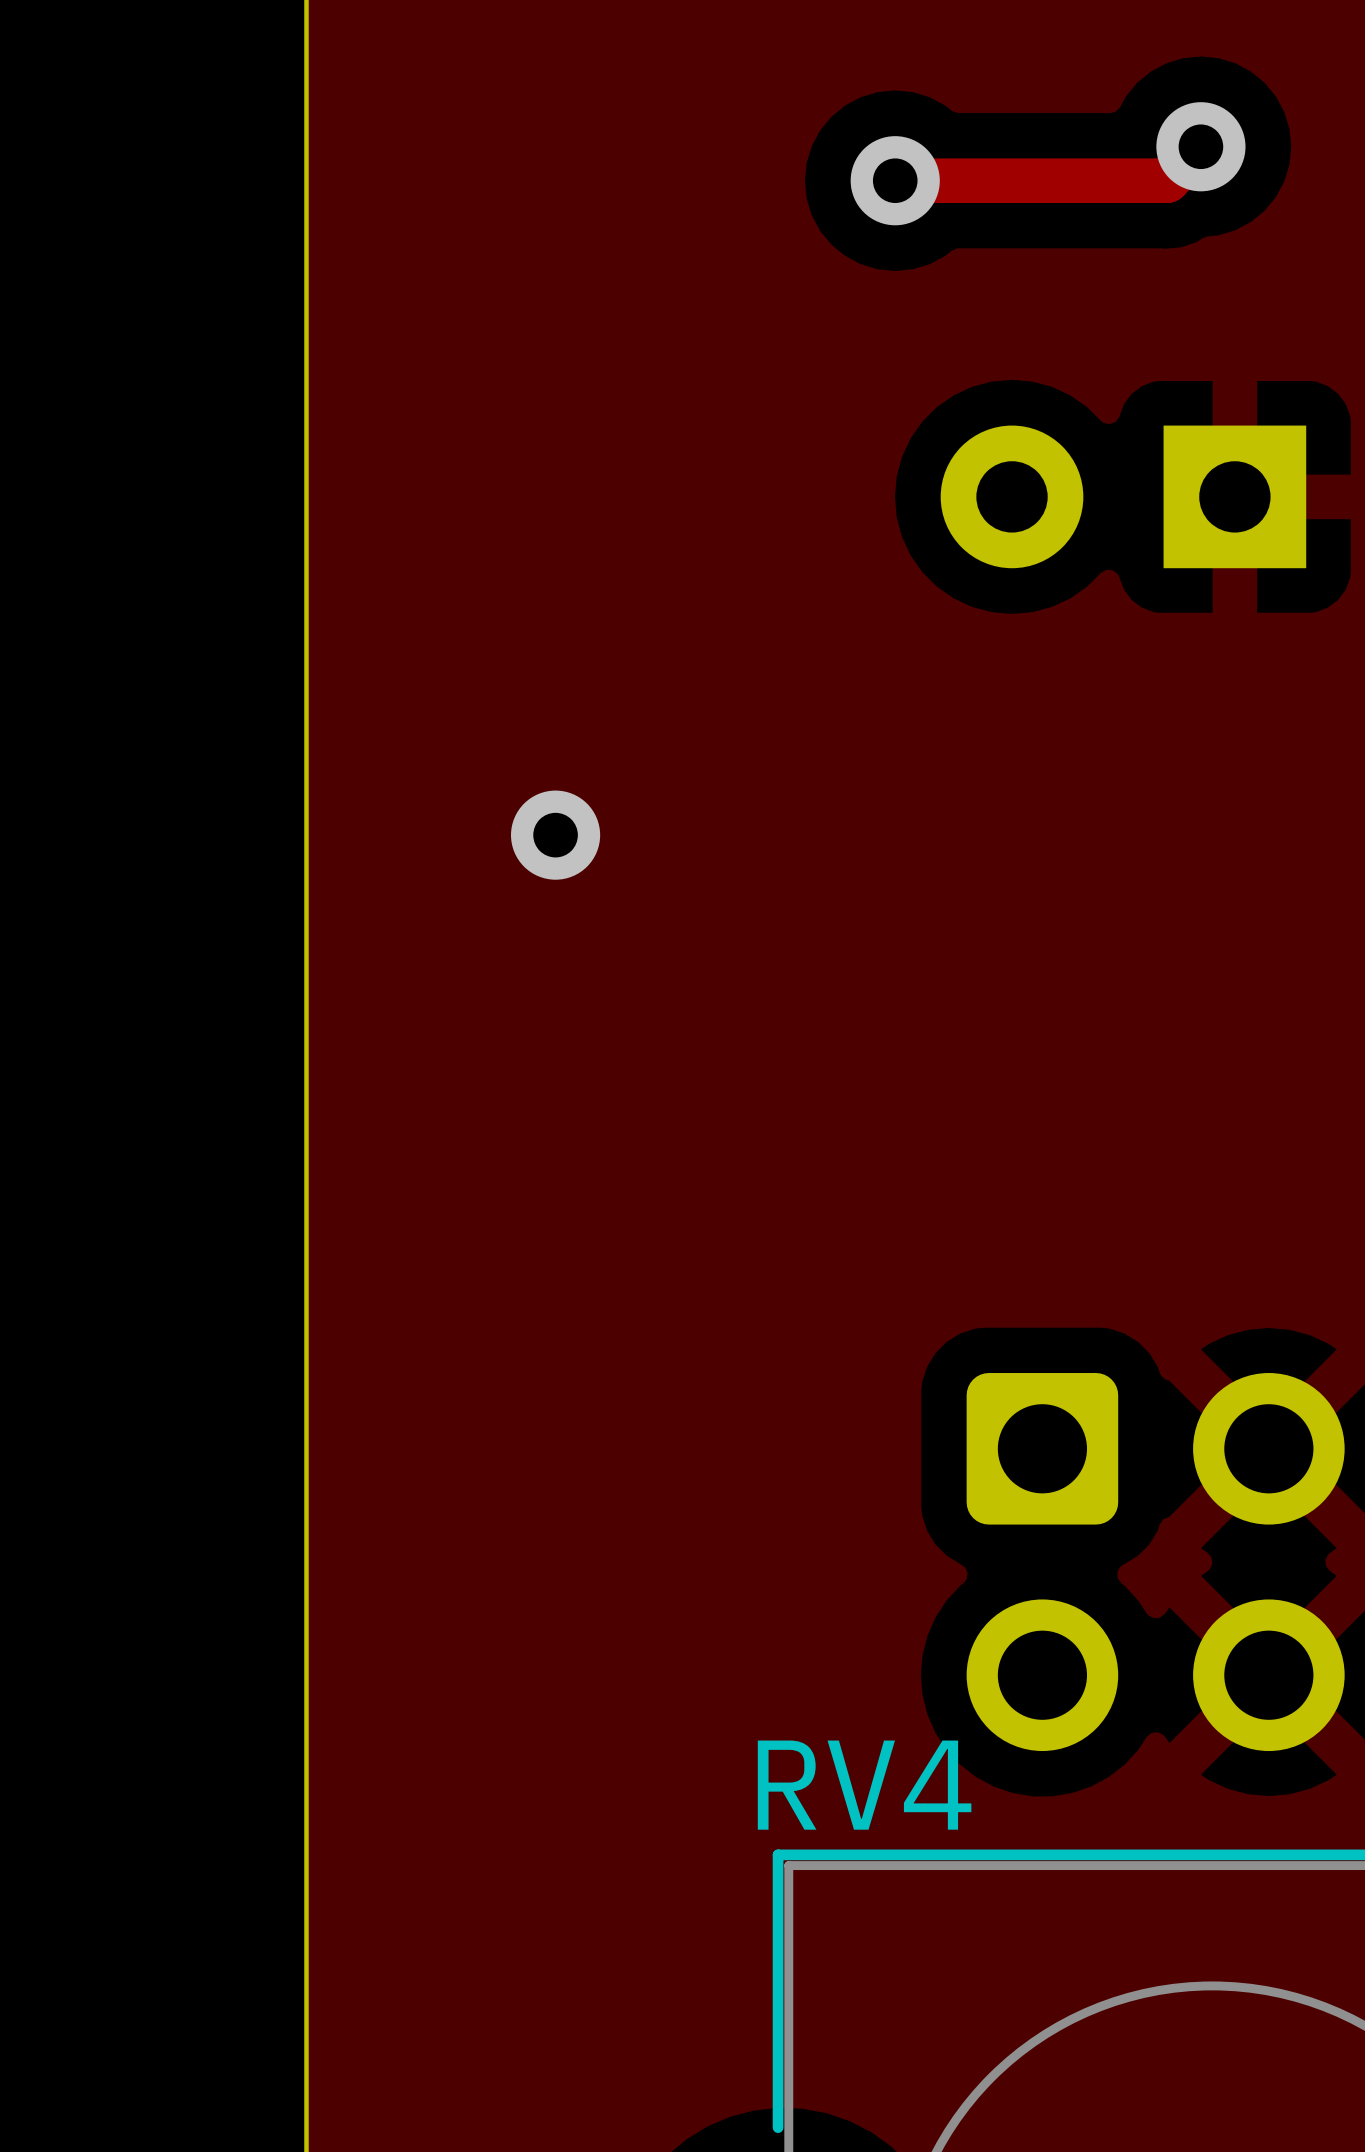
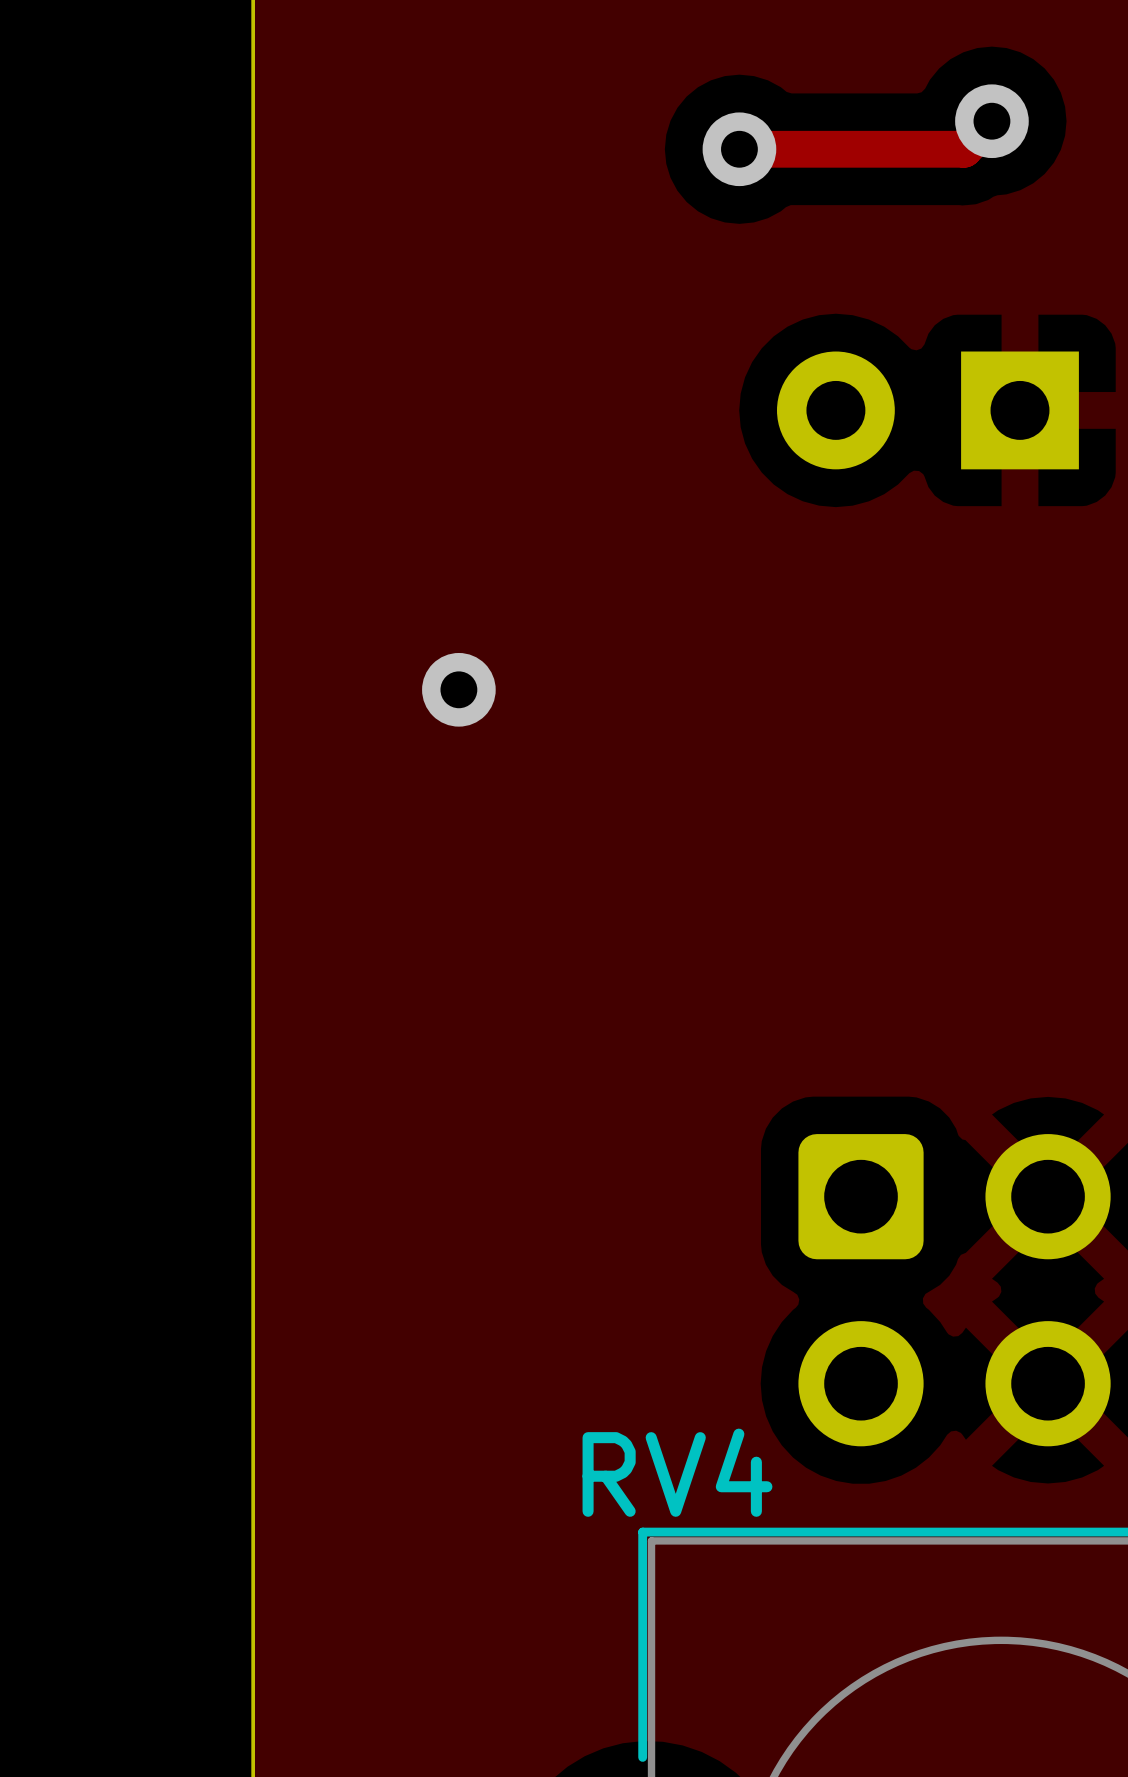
RV4 name position: RV4 (864, 1785) -> RV4 (677, 1472)

